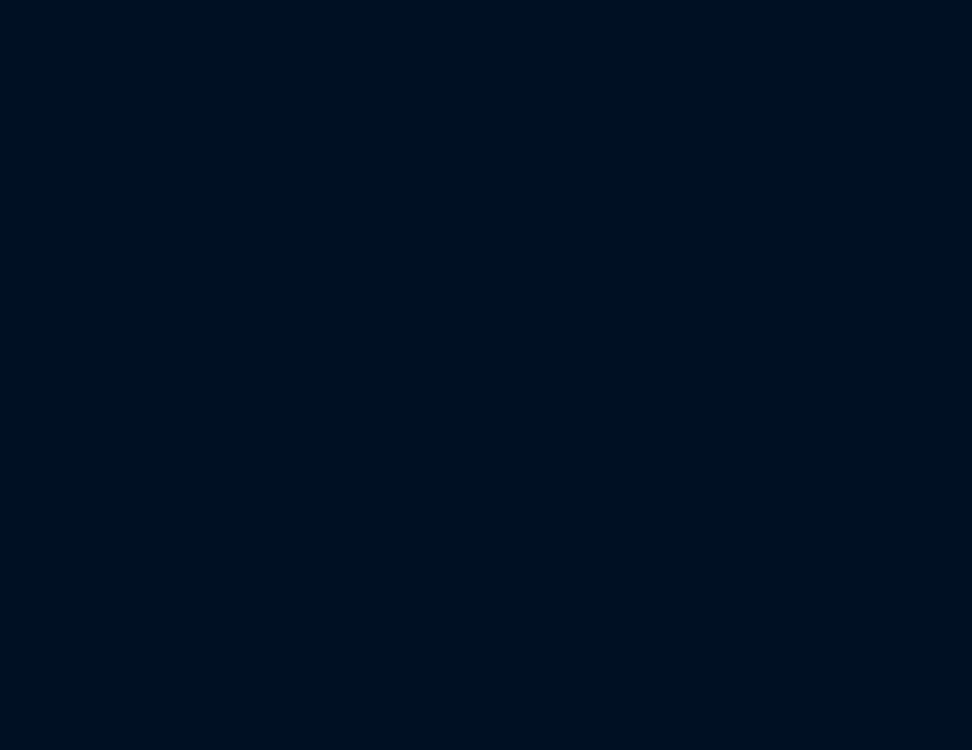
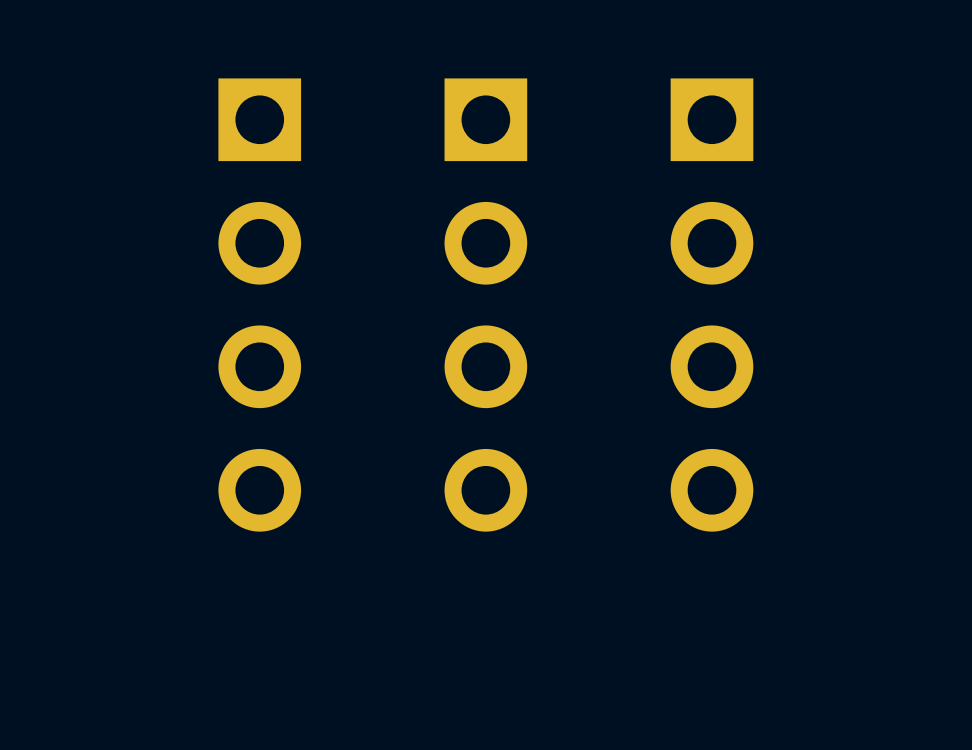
part: none -> (259, 305)
part: none -> (485, 305)
part: none -> (711, 305)

